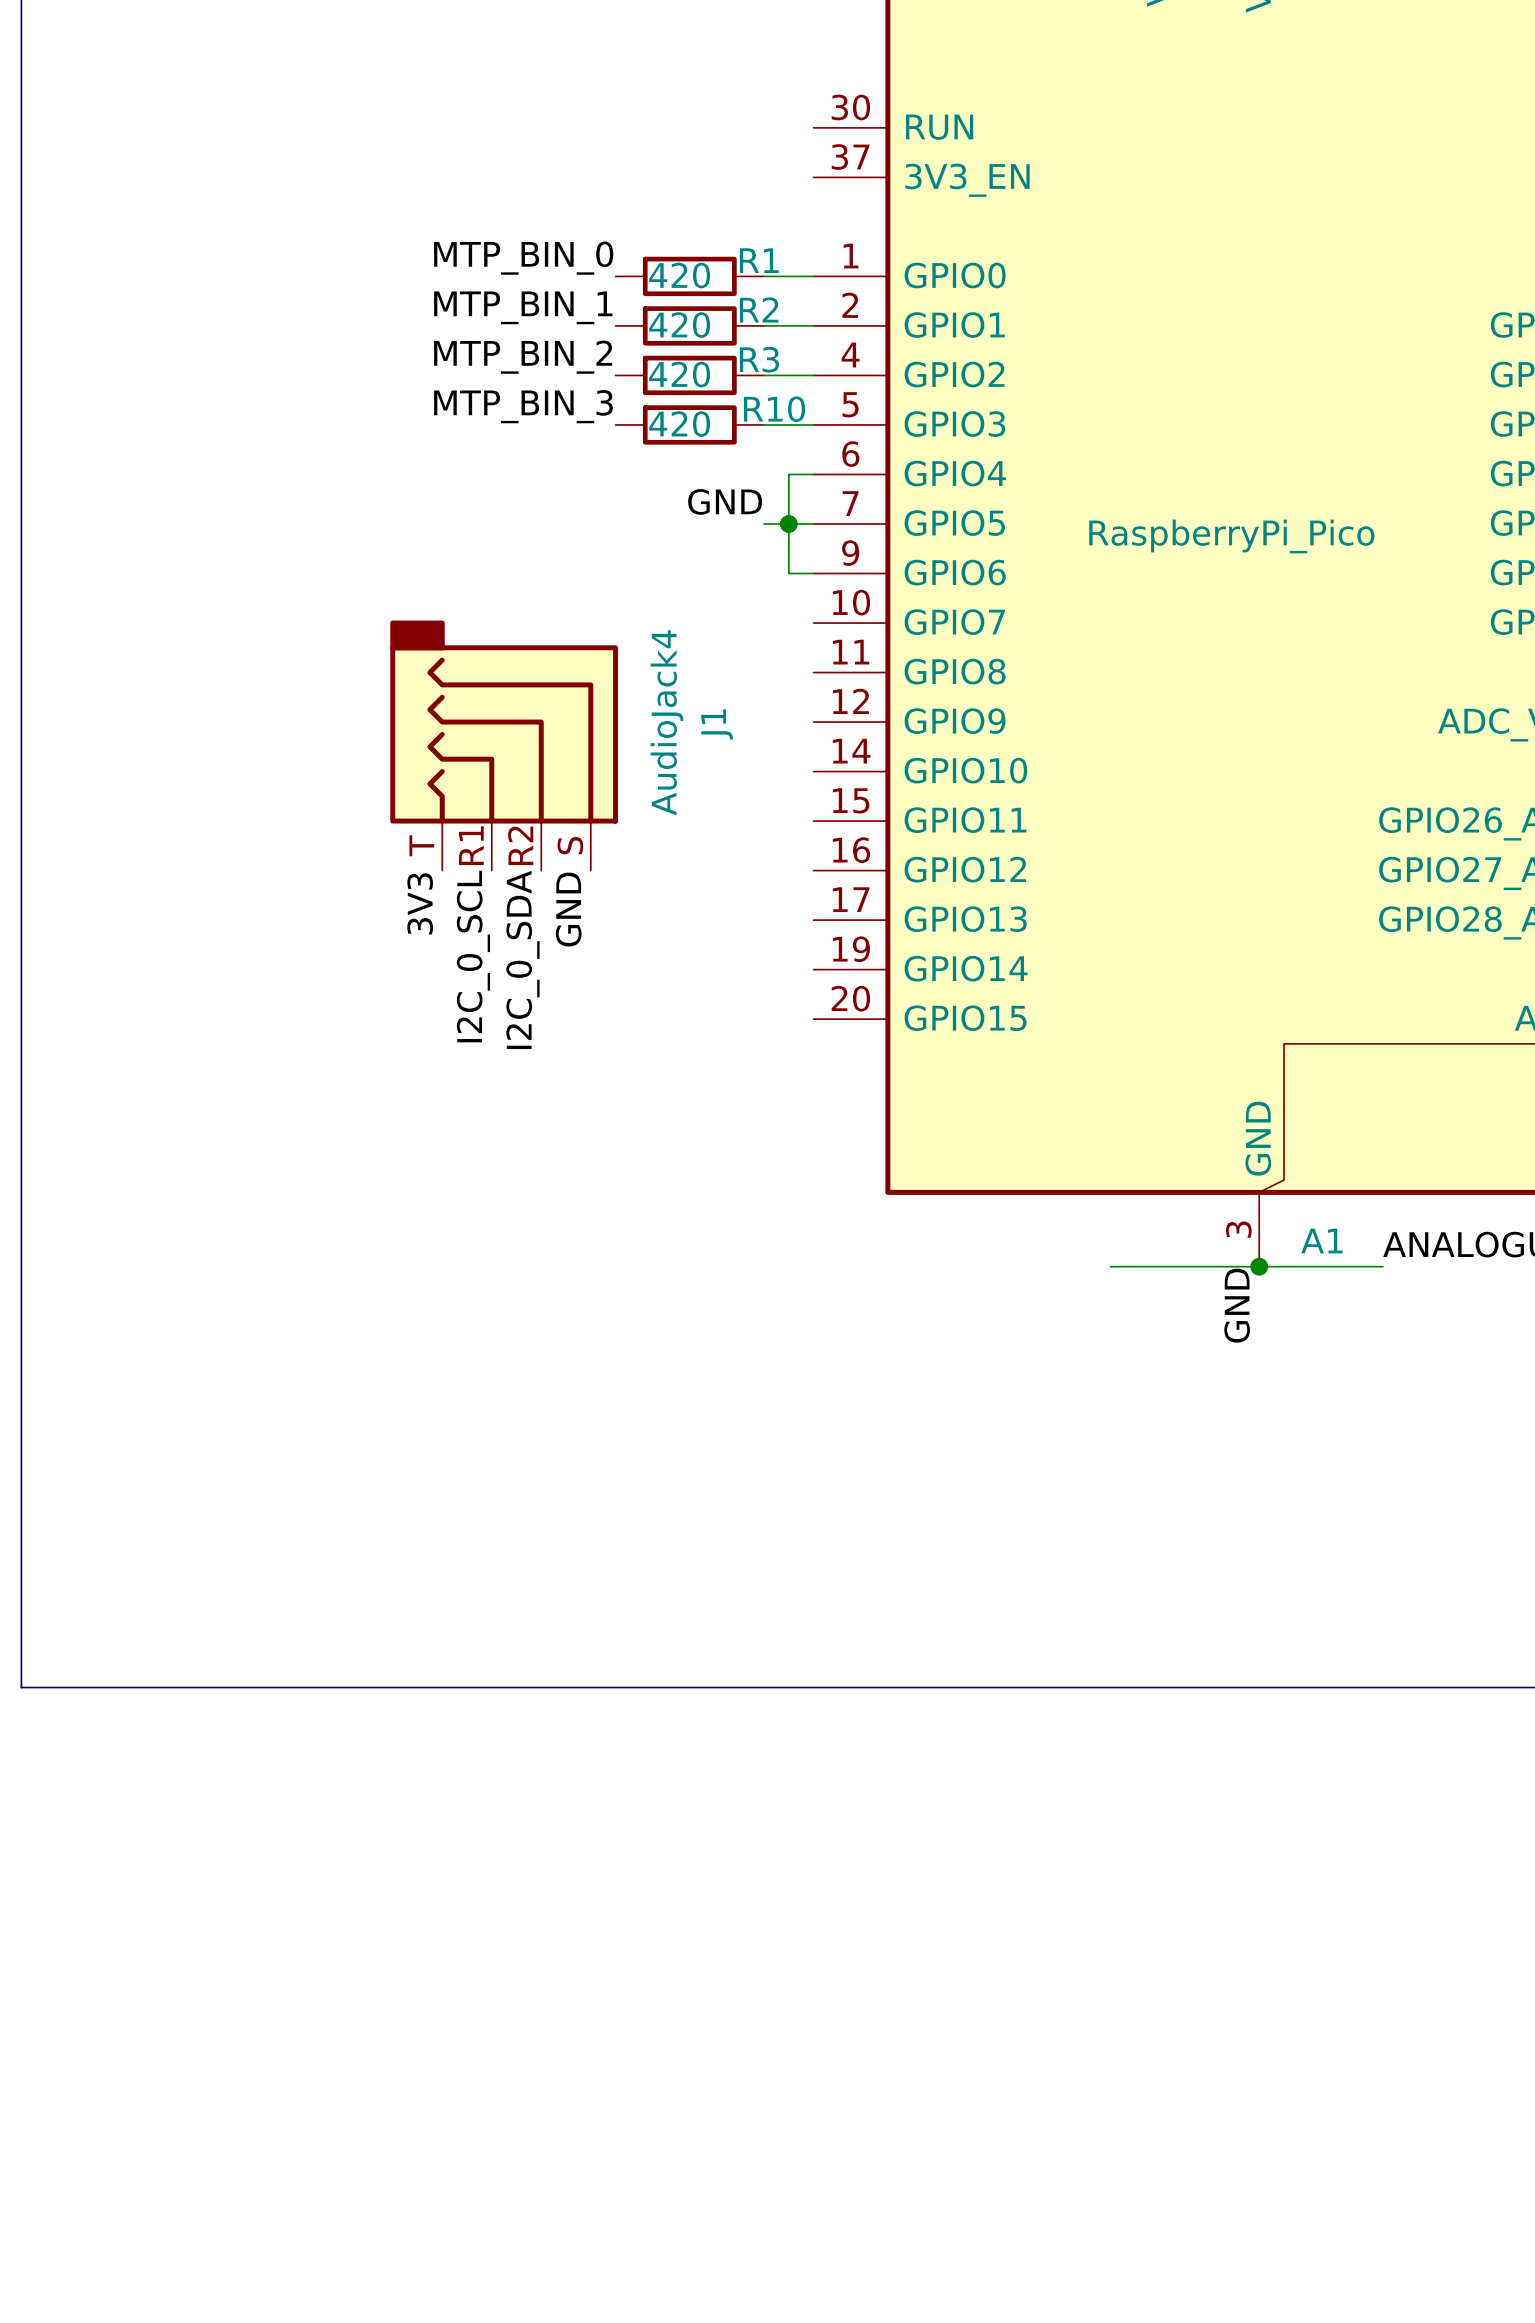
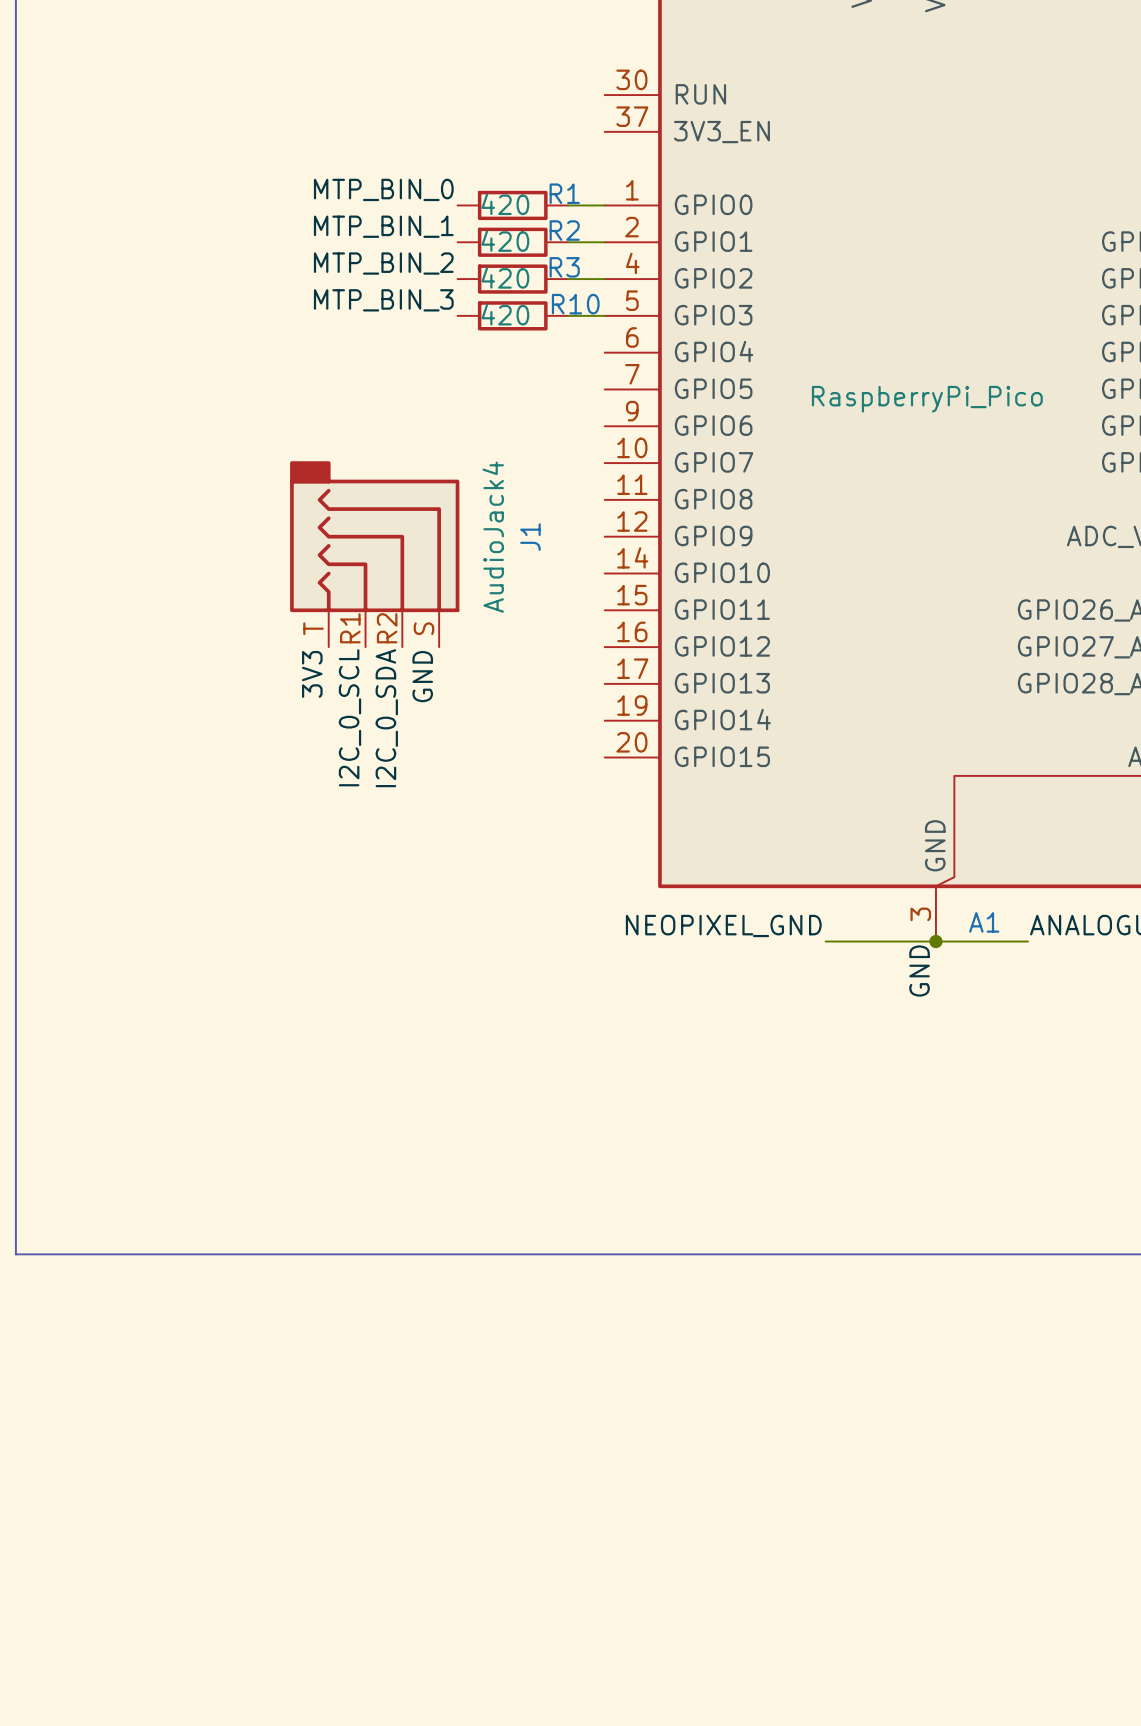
wire: (813, 474) (788, 474) (788, 573) (813, 573) -> none
label: GND (725, 501) -> none
wire: (764, 523) (813, 523) -> none
junction: (788, 523) -> none
label: none -> NEOPIXEL_GND (723, 925)

